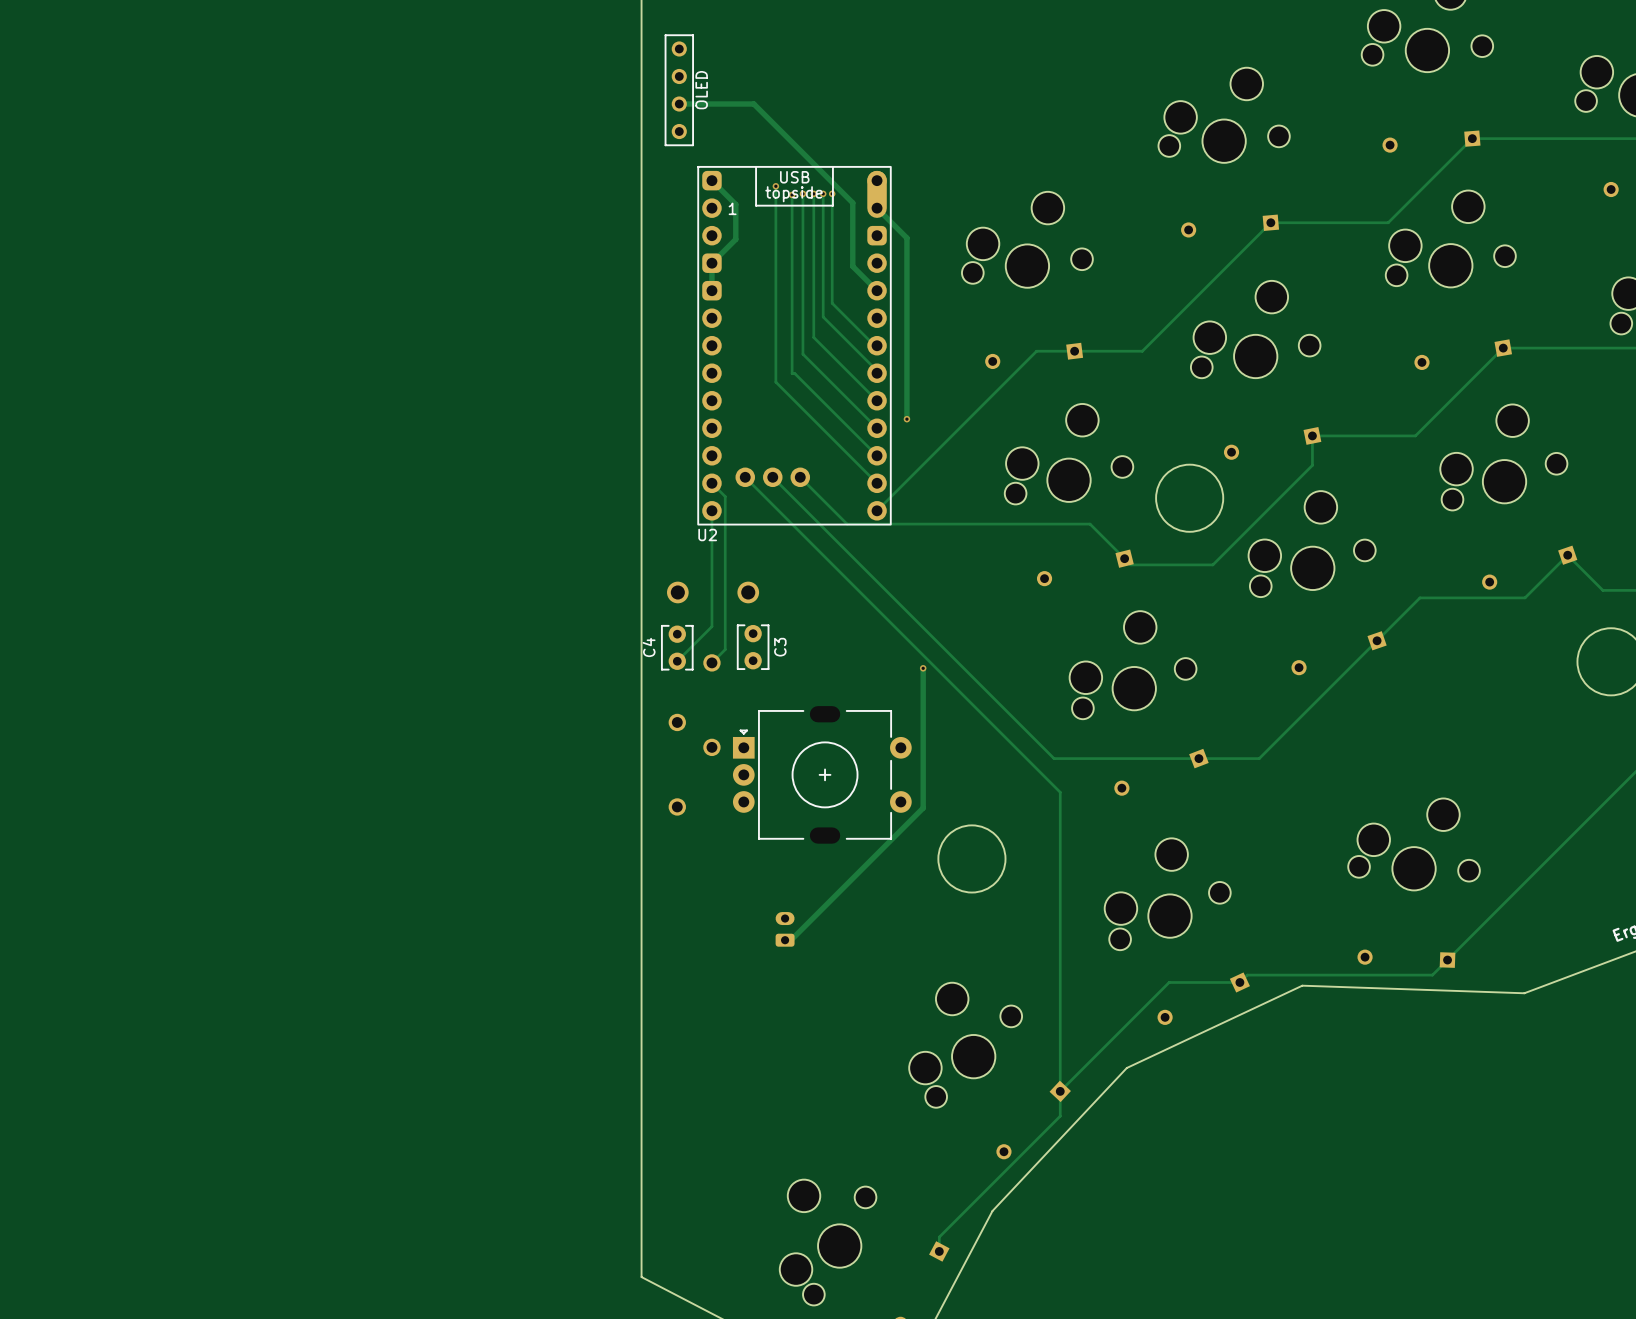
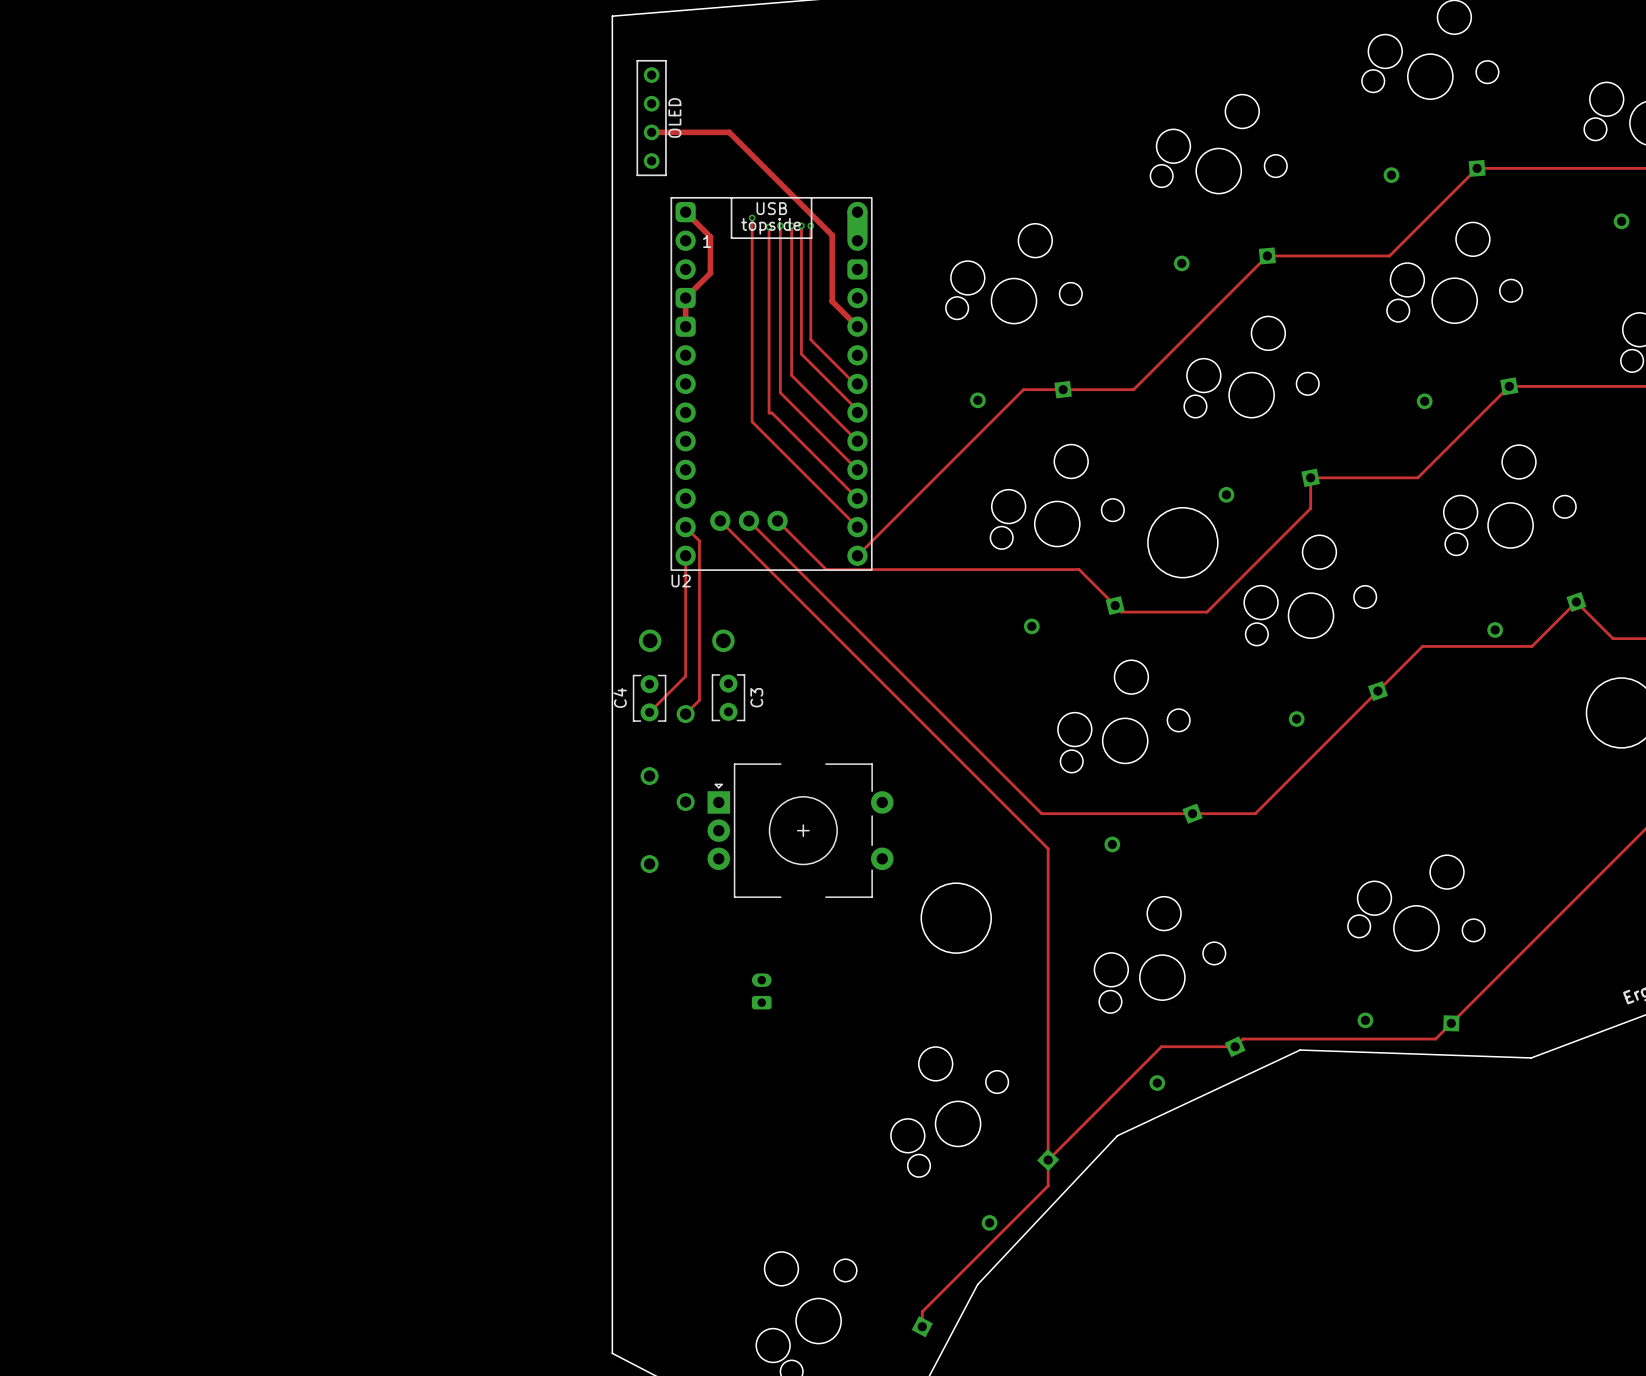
track: (877, 208) (906, 238) (906, 419) -> none
via: (906, 419) -> none
track: (923, 668) (923, 808) (791, 940) (785, 940) -> none
via: (923, 668) -> none

